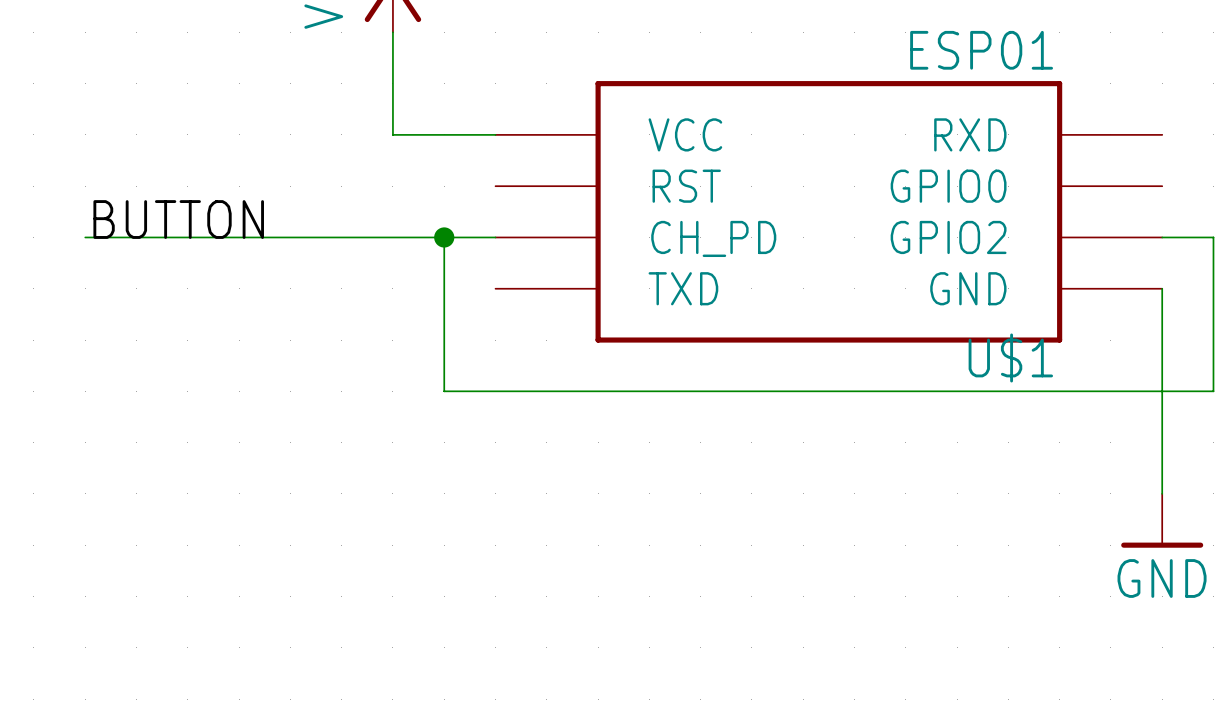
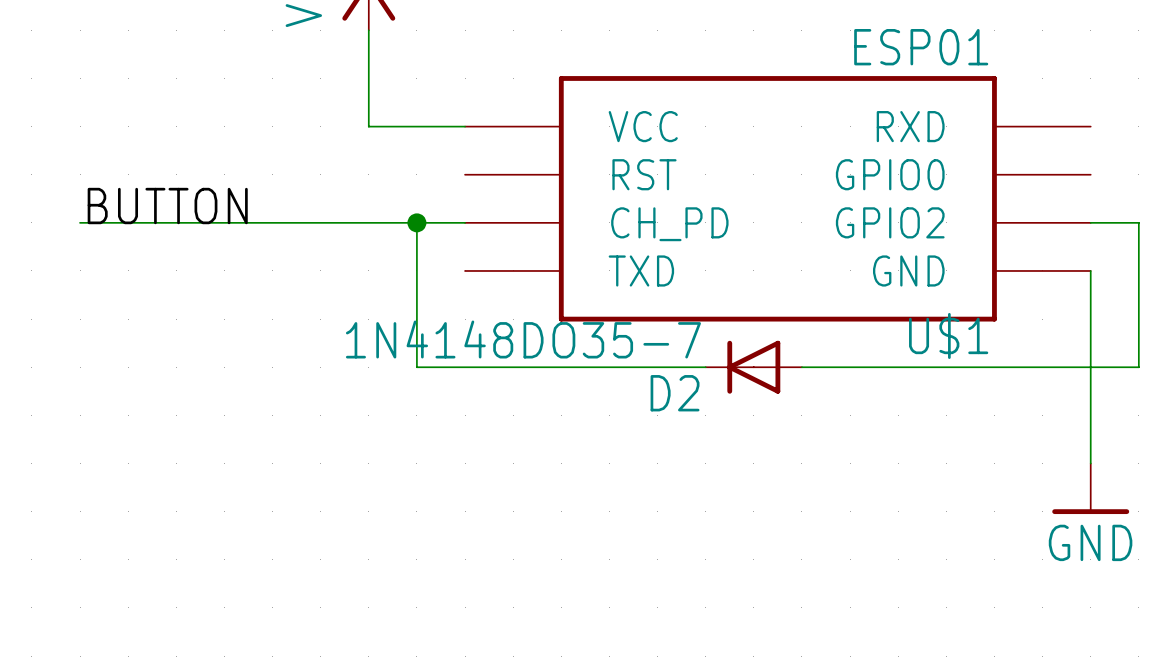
D2: none -> 1N4148DO35-7 (753, 367)

